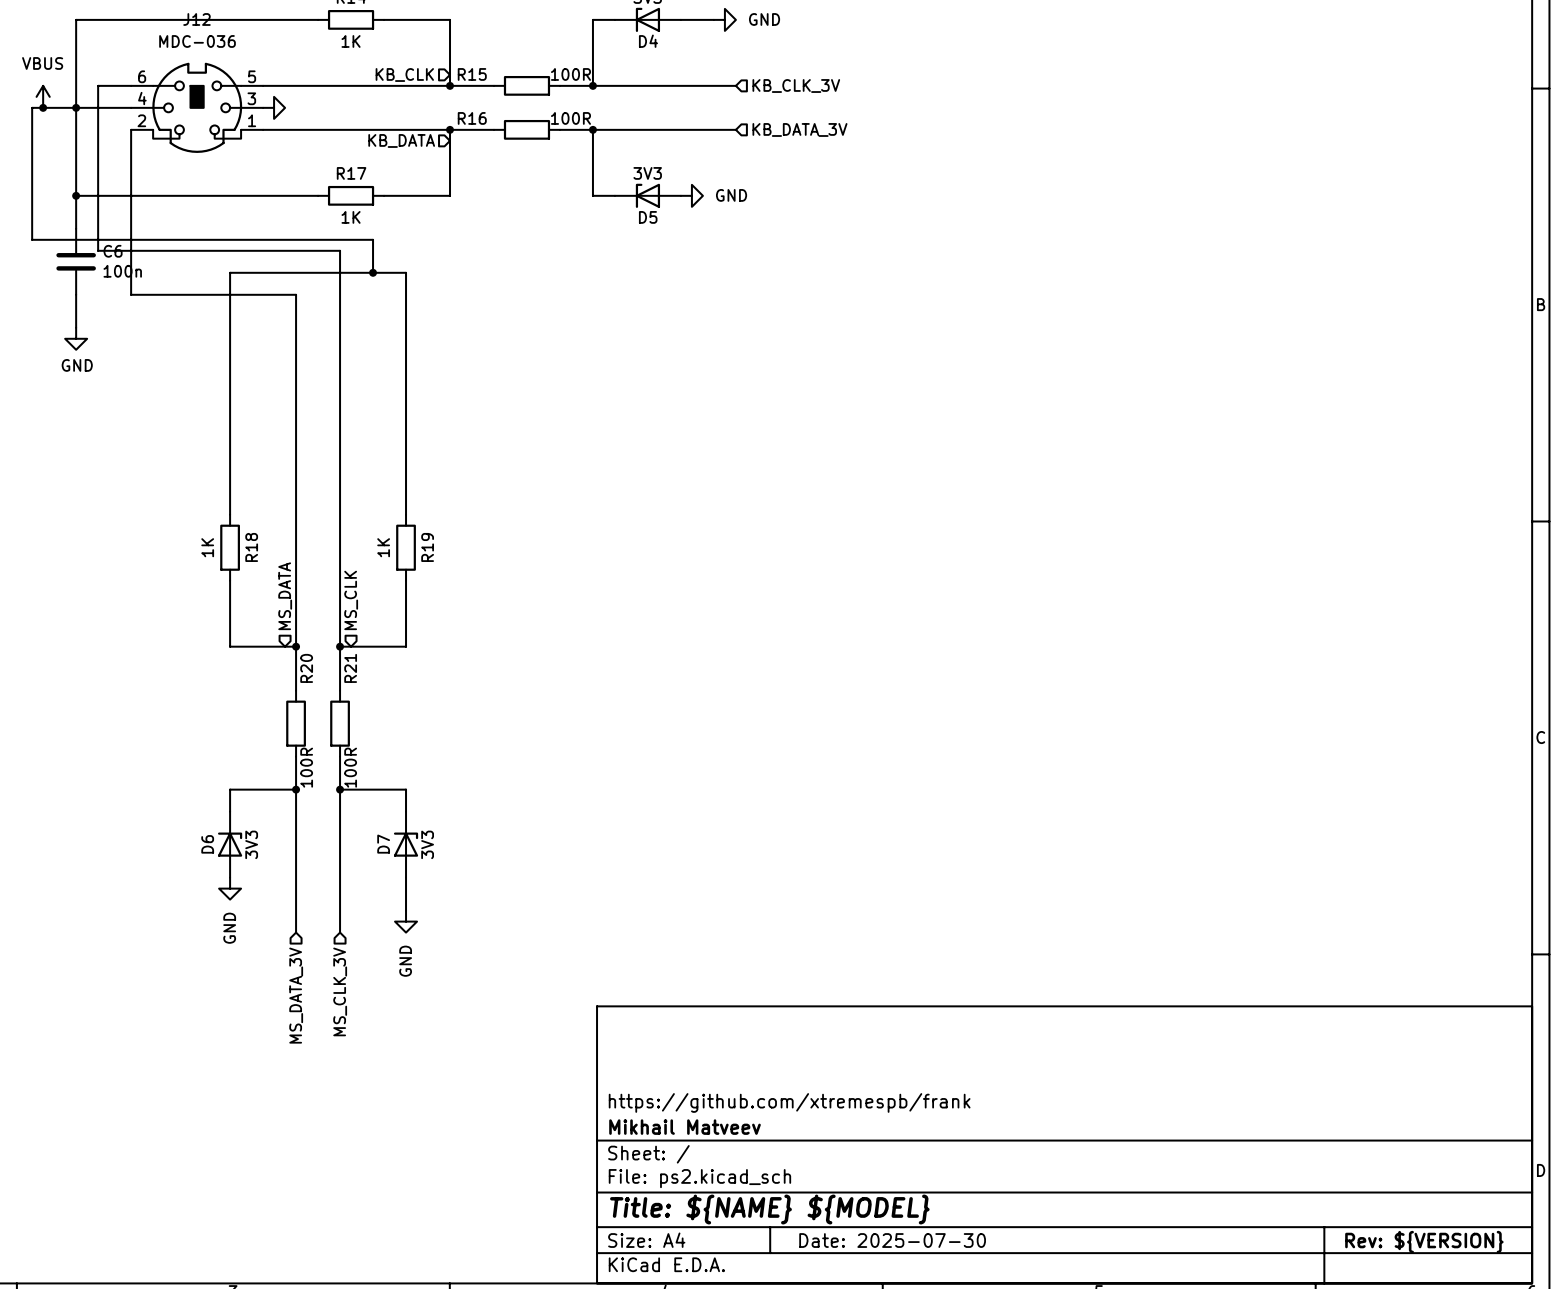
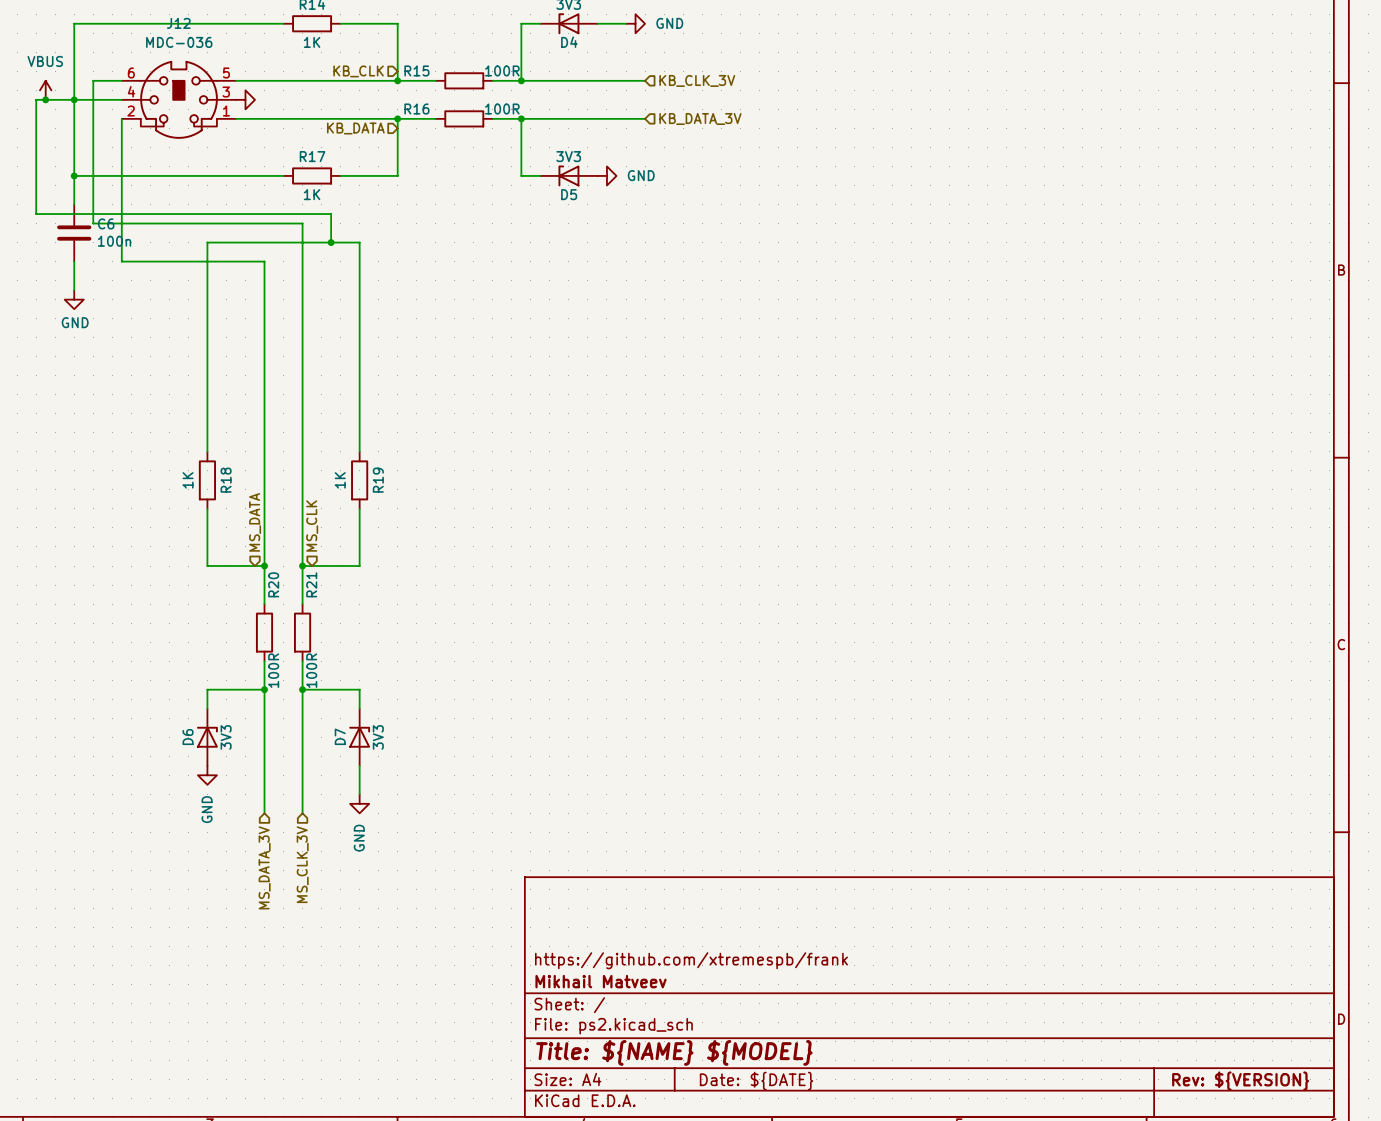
title block: Date: 2025-07-30 (892, 1240) -> Date: ${DATE} (756, 1081)

